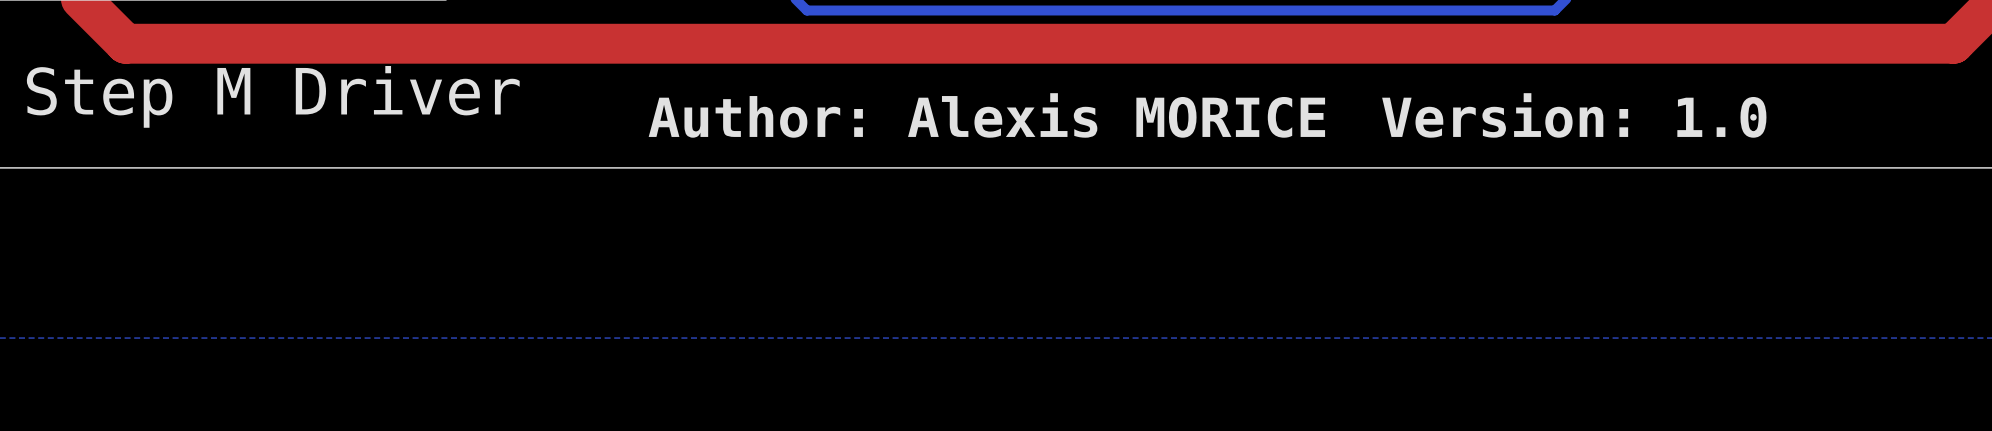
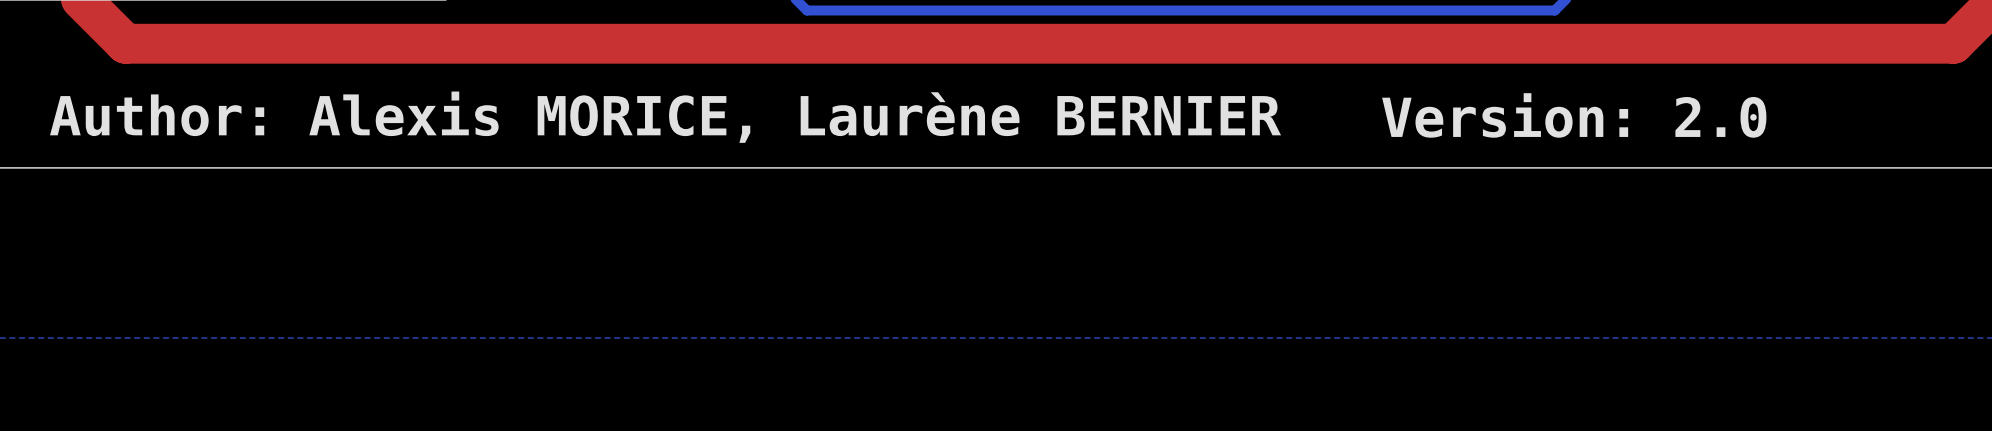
text: Step M Driver (273, 96) -> none
text: Author: Alexis MORICE (986, 115) -> Author: Alexis MORICE, Laurène BERNIER (665, 117)
text: Version: 1.0 (1574, 115) -> Version: 2.0 (1574, 115)

